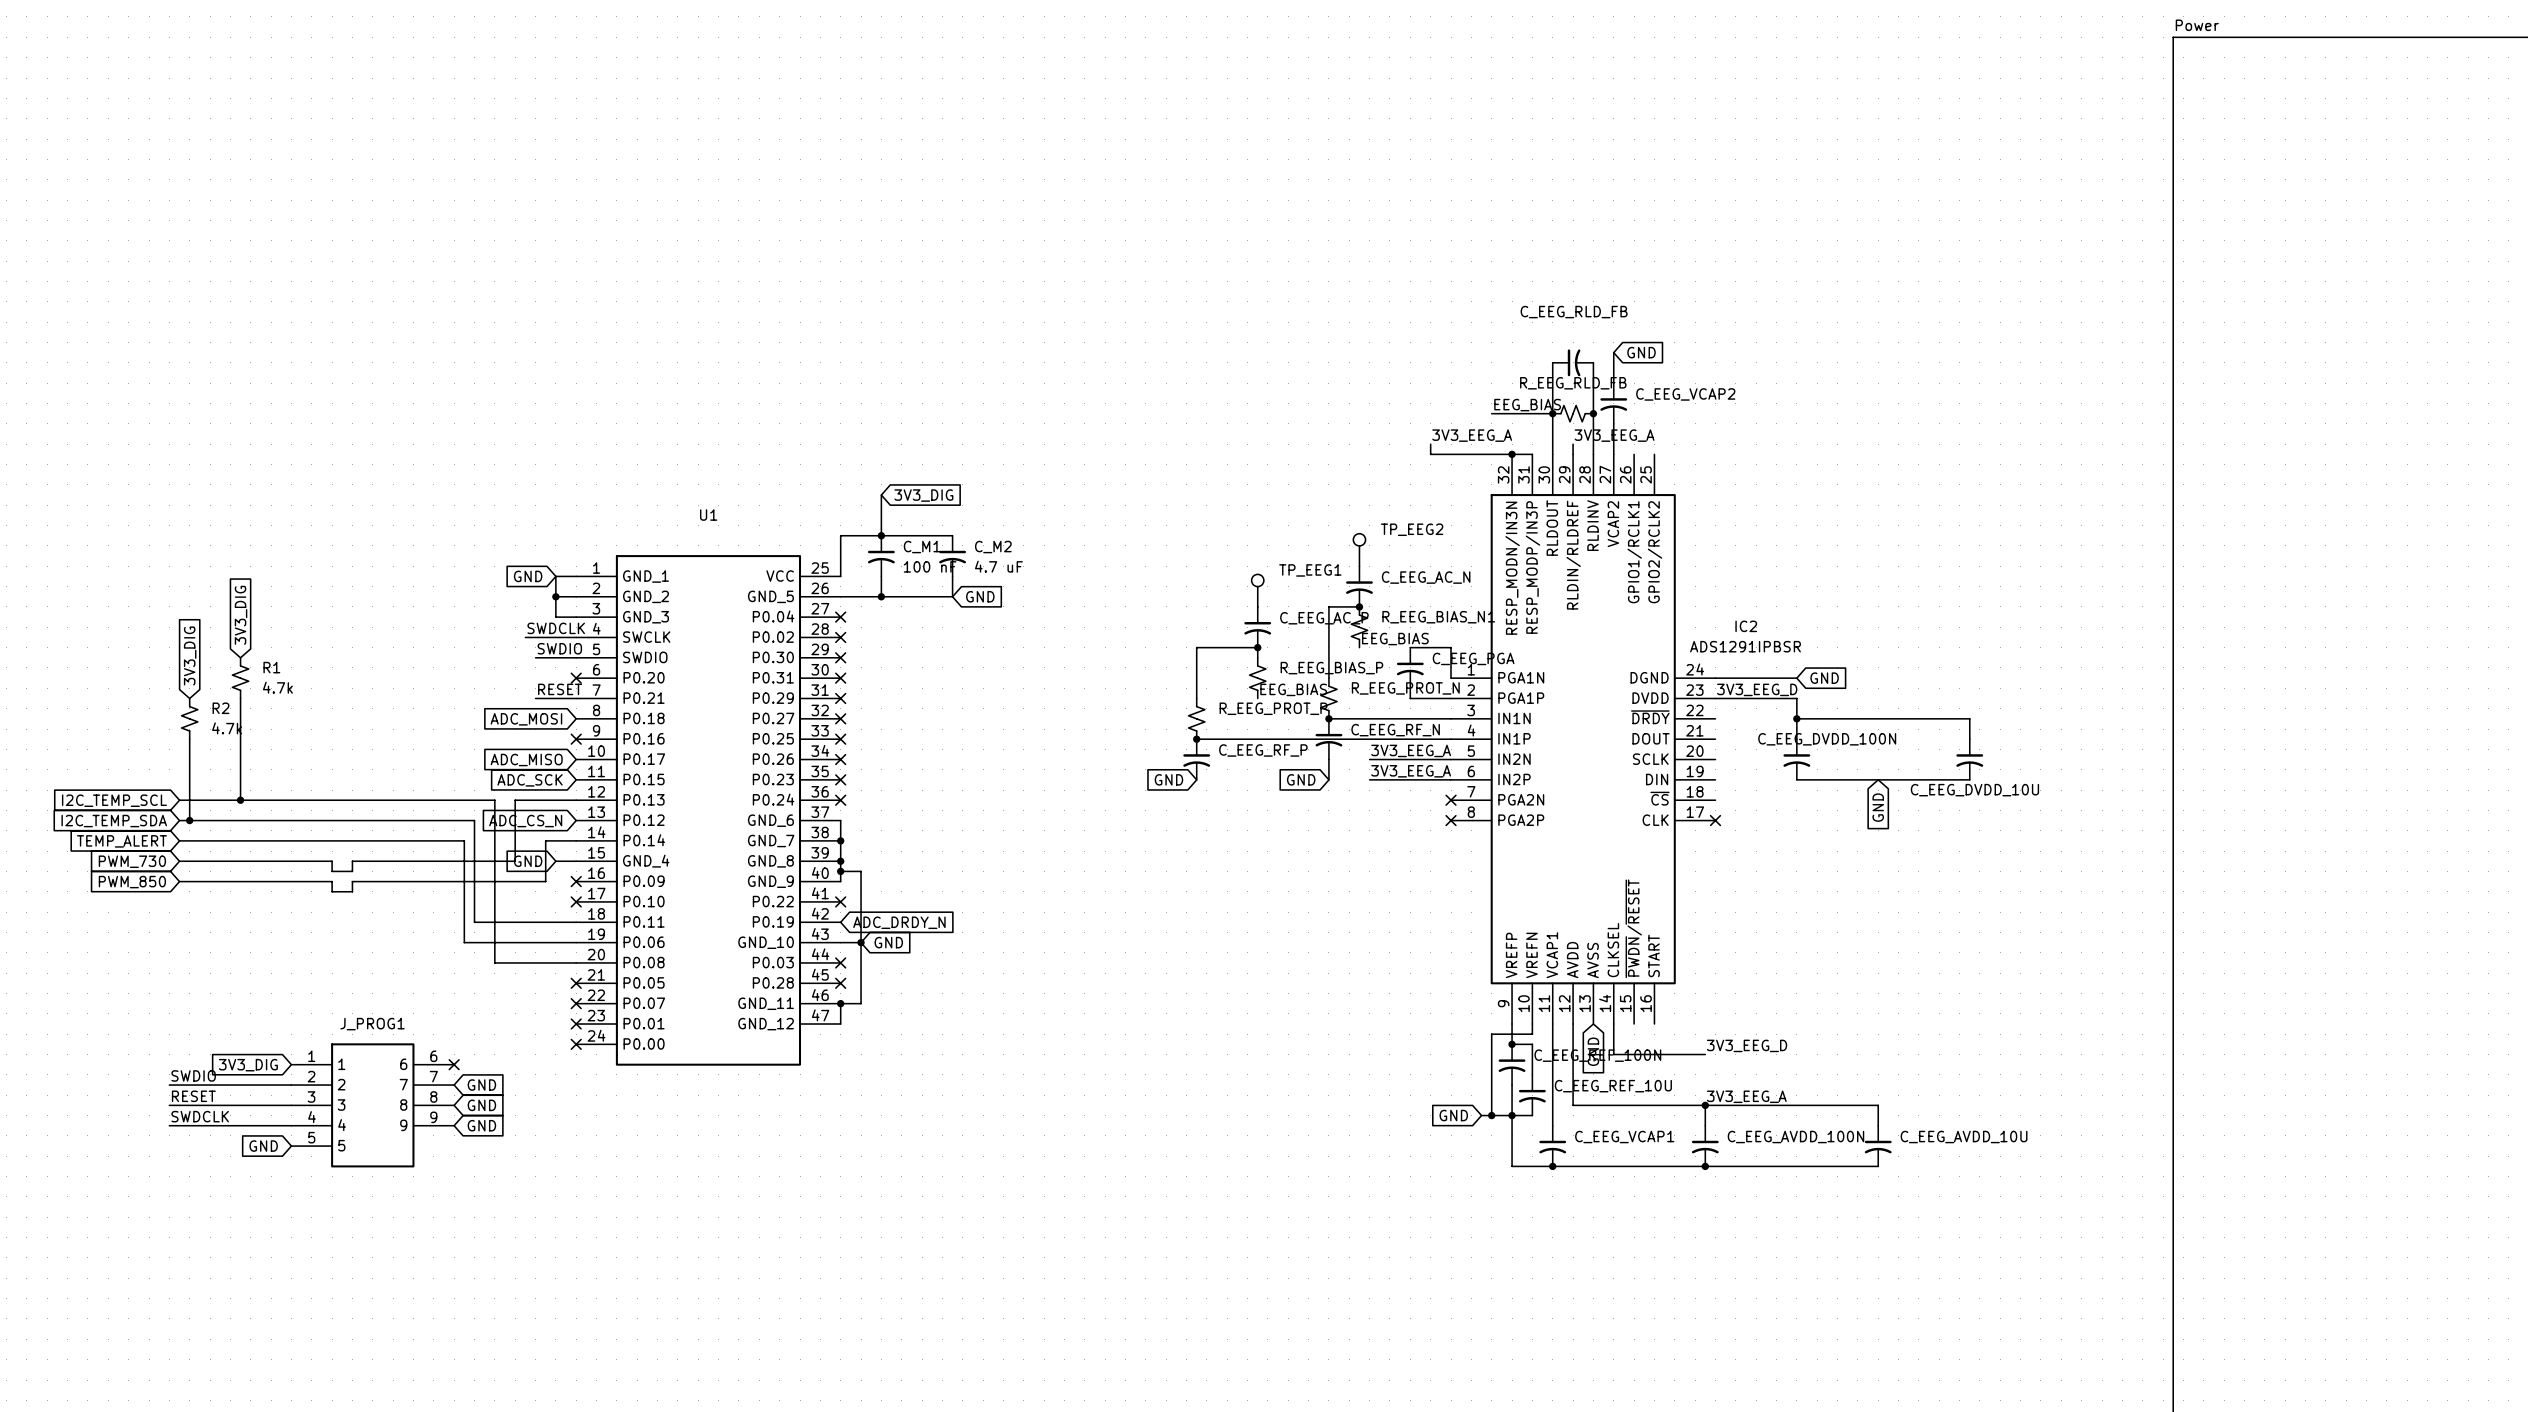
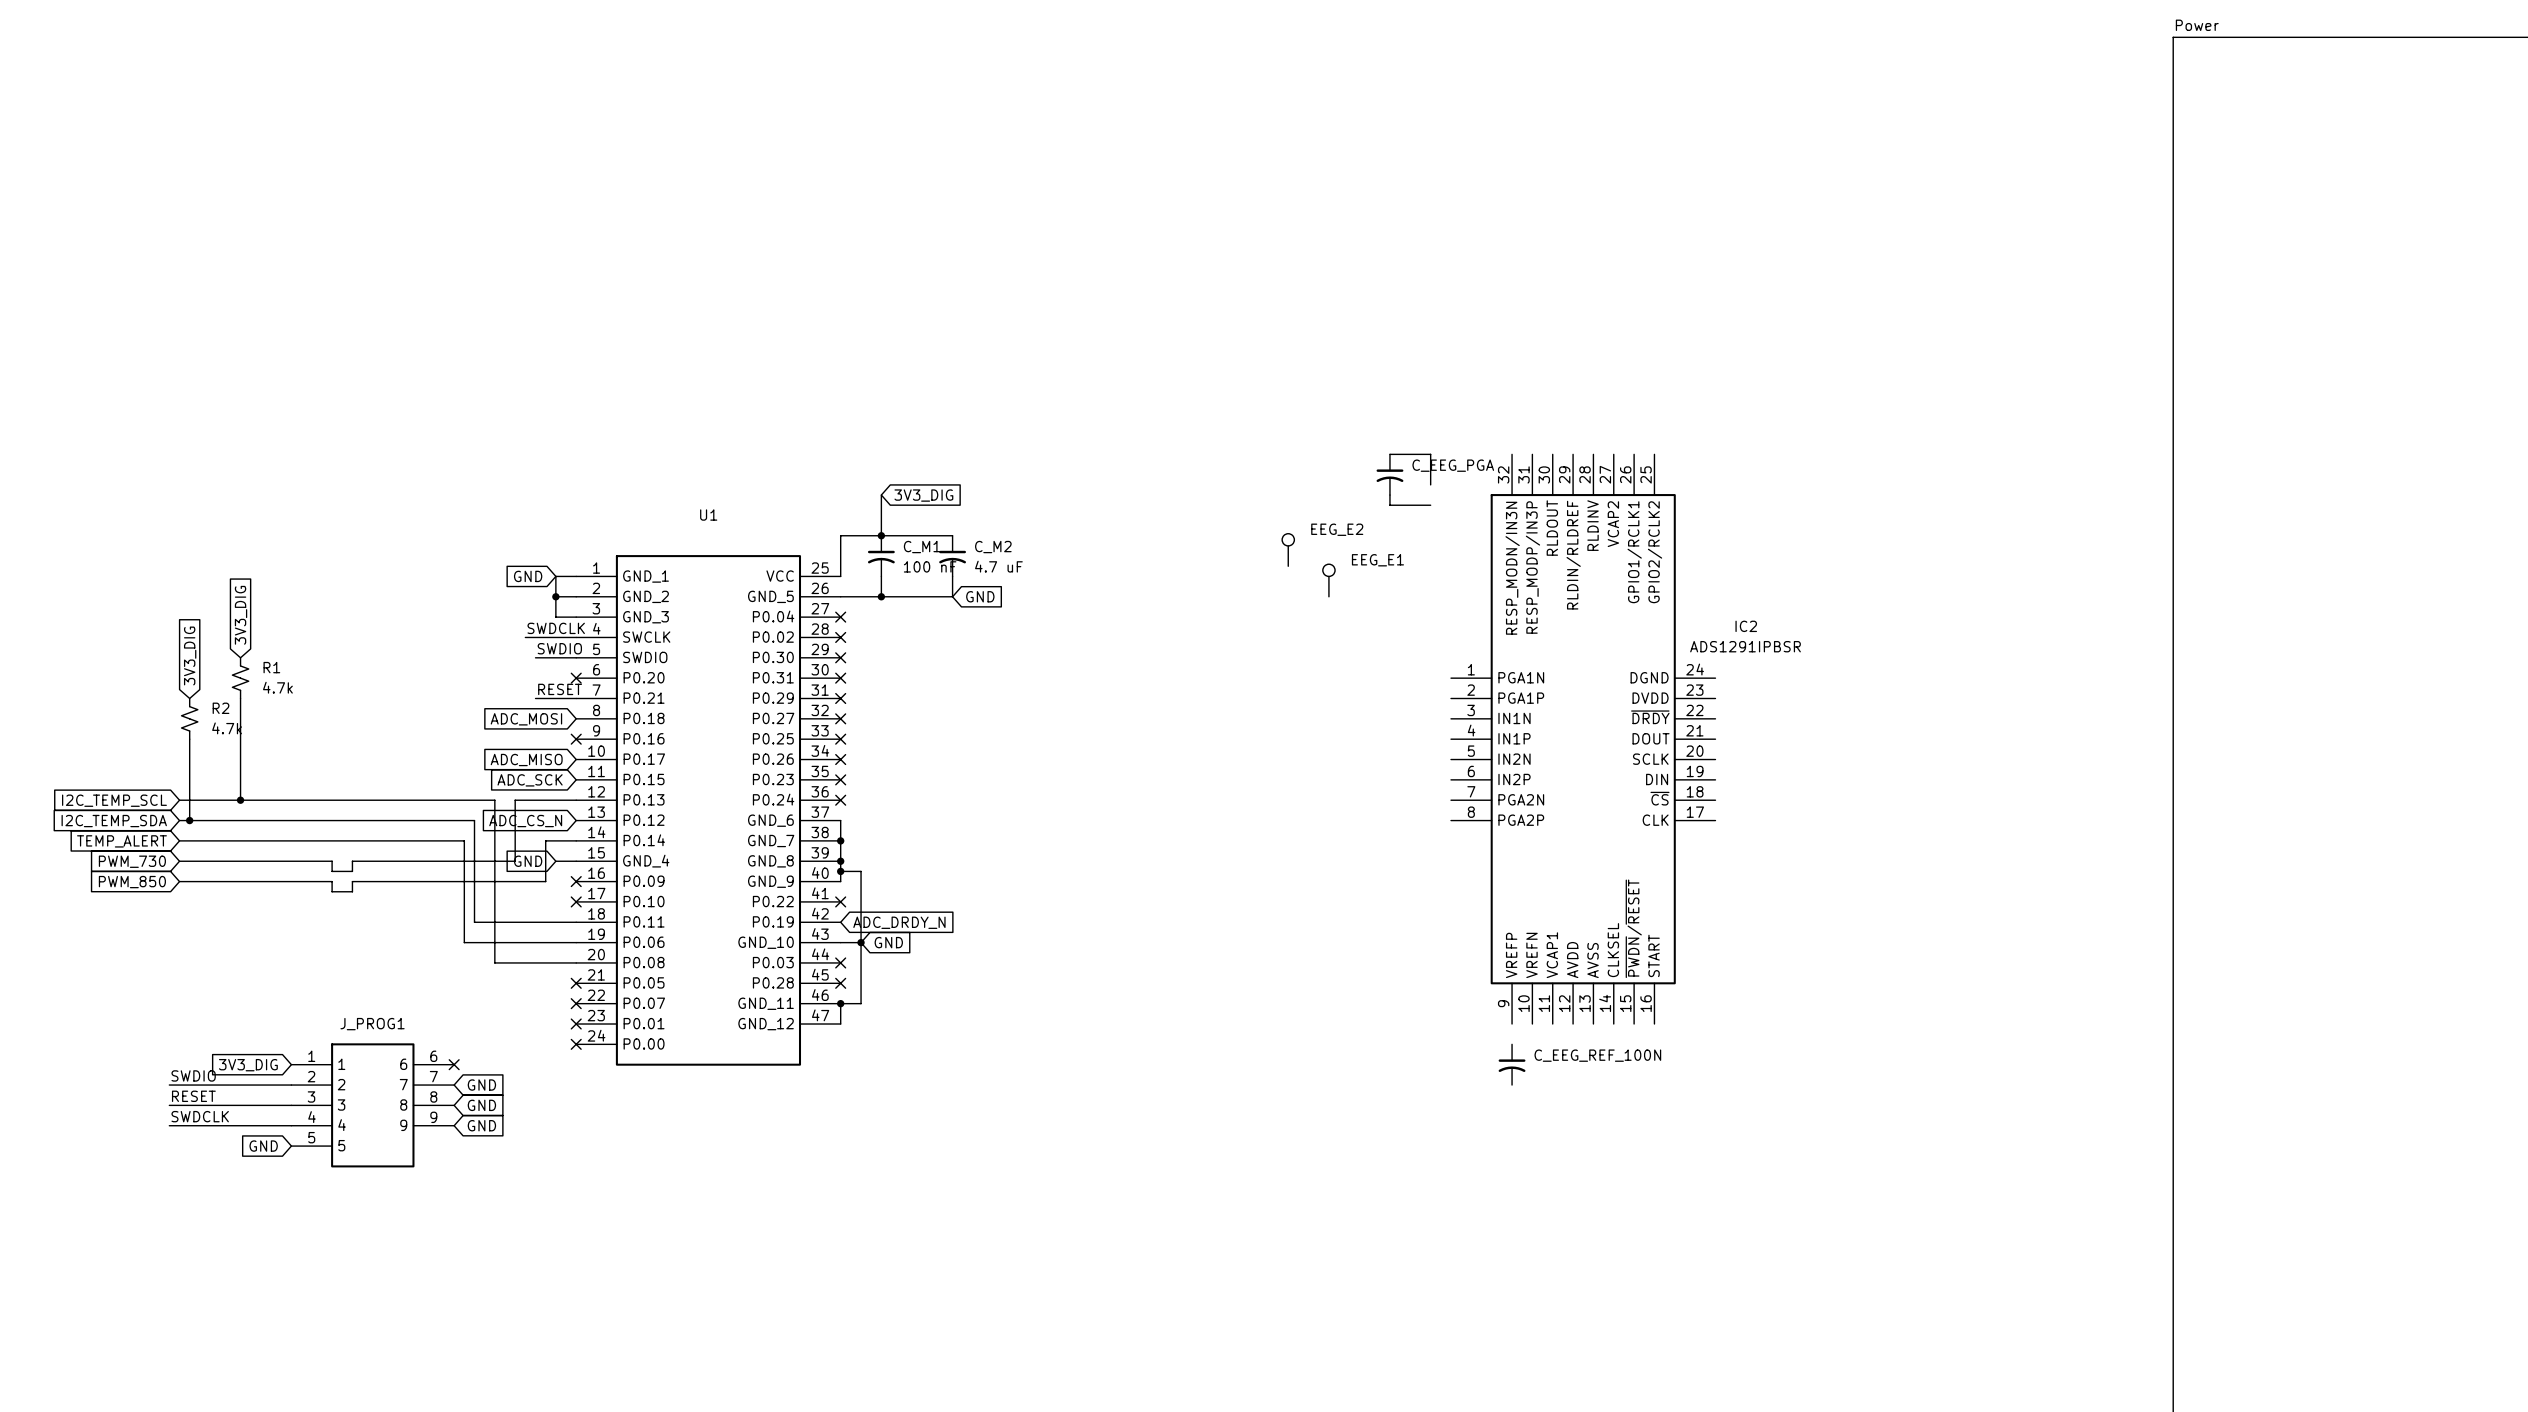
wire: (1613, 352) (1613, 383) -> none
global label: GND (1641, 352) -> none
wire: (1552, 362) (1552, 454) -> none
C_EEG_RLD_FB: (1573, 362) -> none
wire: (1593, 362) (1593, 454) -> none
C_EEG_VCAP2: (1613, 403) -> none
label: EEG_BIAS (1527, 405) -> none
wire: (1491, 413) (1552, 413) -> none
junction: (1552, 413) -> none
R_EEG_RLD_FB: (1573, 413) -> none
junction: (1593, 413) -> none
wire: (1613, 423) (1613, 454) -> none
label: 3V3_EEG_A (1472, 435) -> none
label: 3V3_EEG_A (1614, 435) -> none
wire: (1430, 444) (1430, 454) (1532, 454) -> none
wire: (1573, 444) (1573, 454) -> none
junction: (1512, 454) -> none
EEG_E2: none -> (1288, 549)
TP_EEG2: (1359, 549) -> none
EEG_E1: none -> (1328, 580)
C_EEG_AC_N: (1359, 586) -> none
TP_EEG1: (1257, 590) -> none
wire: (1359, 606) (1328, 606) (1328, 678) -> none
junction: (1359, 606) -> none
C_EEG_AC_P: (1257, 627) -> none
R_EEG_BIAS_N1: (1359, 627) -> none
label: EEG_BIAS (1395, 639) -> none
junction: (1257, 647) -> none
wire: (1410, 647) (1451, 647) (1451, 678) -> (1389, 454) (1430, 454) (1430, 484)
wire: (1257, 657) (1257, 647) (1196, 647) (1196, 698) -> none
C_EEG_PGA position: (1410, 667) -> (1389, 474)
R_EEG_BIAS_P: (1257, 678) -> none
wire: (1715, 678) (1796, 678) -> none
global label: GND (1824, 678) -> none
wire: (1410, 688) (1410, 698) (1451, 698) -> (1389, 495) (1389, 505) (1430, 505)
label: EEG_BIAS (1293, 689) -> none
label: 3V3_EEG_D (1757, 689) -> none
R_EEG_PROT_N: (1328, 698) -> none
wire: (1715, 698) (1796, 698) (1796, 739) -> none
R_EEG_PROT_P: (1196, 718) -> none
wire: (1328, 718) (1451, 718) -> none
junction: (1328, 718) -> none
wire: (1796, 718) (1969, 718) (1969, 739) -> none
junction: (1796, 718) -> none
wire: (1196, 739) (1451, 739) -> none
junction: (1196, 739) -> none
C_EEG_RF_N: (1328, 739) -> none
label: 3V3_EEG_A (1411, 750) -> none
C_EEG_RF_P: (1196, 759) -> none
wire: (1328, 759) (1328, 779) -> none
wire: (1369, 759) (1451, 759) -> none
C_EEG_DVDD_100N: (1796, 759) -> none
C_EEG_DVDD_10U: (1969, 759) -> none
label: 3V3_EEG_A (1411, 771) -> none
global label: GND (1168, 779) -> none
global label: GND (1301, 779) -> none
wire: (1369, 779) (1451, 779) -> none
wire: (1796, 779) (1969, 779) -> none
no-connect mark: (1451, 800) -> none
global label: GND (1878, 807) -> none
no-connect mark: (1451, 820) -> none
no-connect mark: (1715, 820) -> none
wire: (1512, 1024) (1512, 1044) (1532, 1044) (1532, 1074) -> none
wire: (1532, 1024) (1532, 1034) (1491, 1034) (1491, 1115) -> none
wire: (1552, 1024) (1552, 1125) -> none
wire: (1573, 1024) (1573, 1105) (1878, 1105) (1878, 1125) -> none
wire: (1613, 1024) (1613, 1054) (1705, 1054) -> none
junction: (1512, 1044) -> none
label: 3V3_EEG_D (1747, 1045) -> none
global label: GND (1593, 1051) -> none
wire: (1512, 1085) (1512, 1166) (1878, 1166) -> none
C_EEG_REF_10U: (1532, 1095) -> none
label: 3V3_EEG_A (1746, 1096) -> none
wire: (1705, 1105) (1705, 1125) -> none
junction: (1705, 1105) -> none
global label: GND (1453, 1115) -> none
wire: (1481, 1115) (1532, 1115) -> none
junction: (1491, 1115) -> none
junction: (1512, 1115) -> none
C_EEG_VCAP1: (1552, 1146) -> none
C_EEG_AVDD_100N: (1705, 1146) -> none
C_EEG_AVDD_10U: (1878, 1146) -> none
junction: (1552, 1166) -> none
junction: (1705, 1166) -> none

